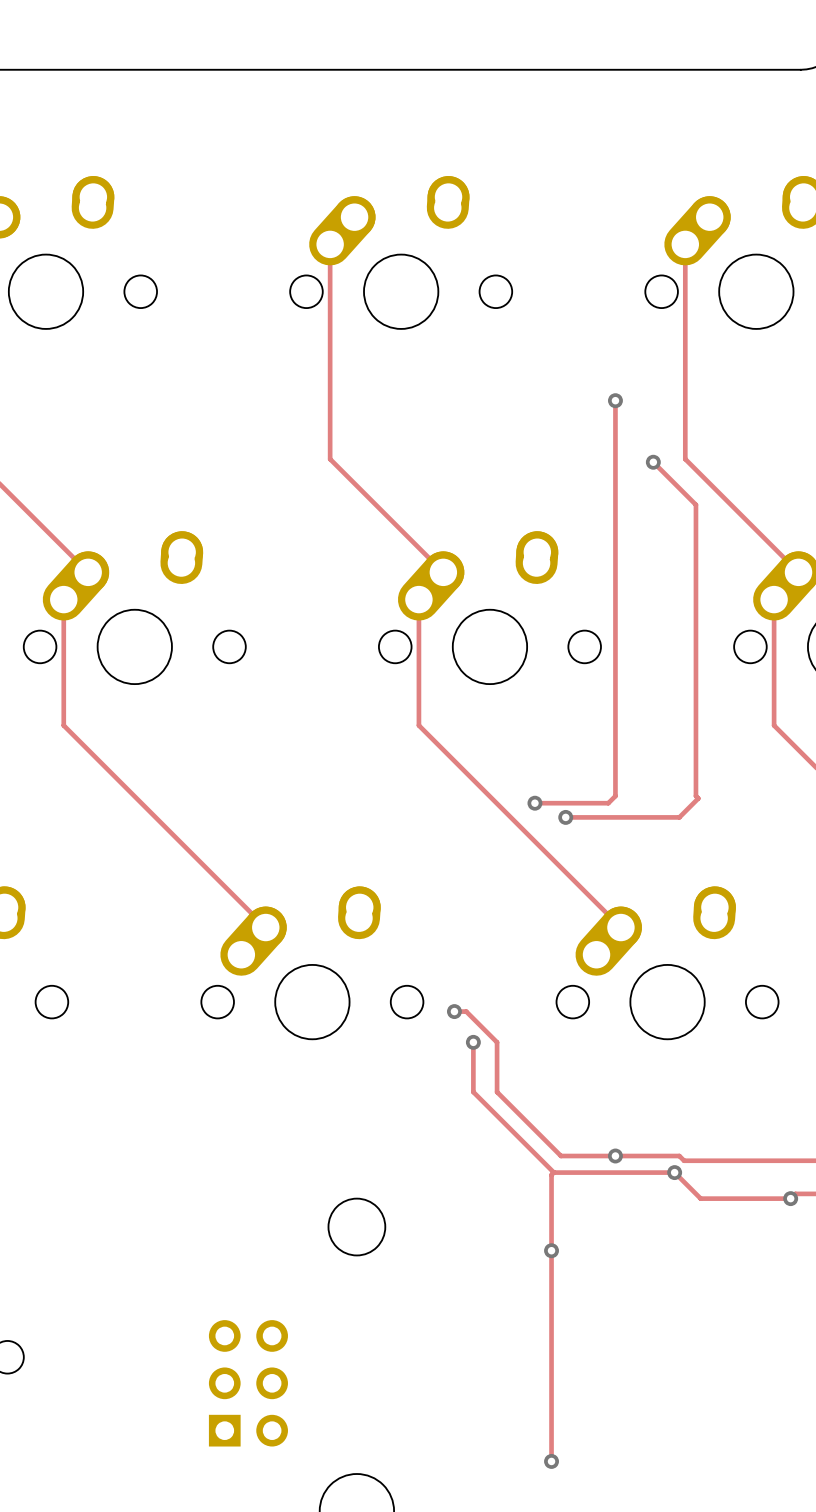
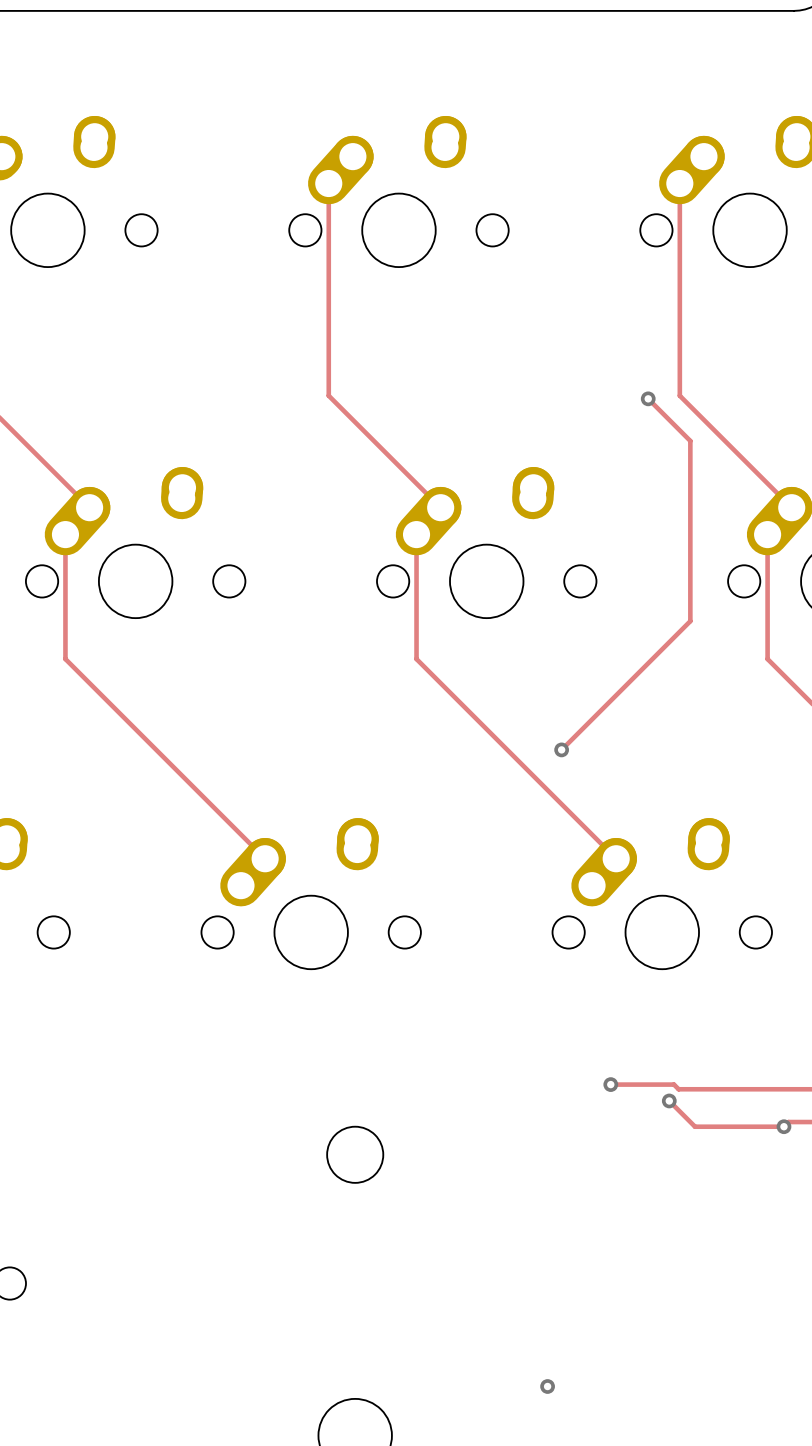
track: (615, 400) (615, 796) (608, 803) (534, 803) -> none
via: (615, 400) -> none
track: (695, 687) (695, 796) (698, 798) (679, 817) (565, 817) -> (690, 621) (561, 749)
via: (534, 803) -> none
track: (454, 1011) (466, 1011) (497, 1042) (497, 1092) (561, 1156) (615, 1156) -> none
via: (454, 1011) -> none
track: (473, 1042) (473, 1092) (553, 1172) -> none
via: (473, 1042) -> none
track: (553, 1172) (674, 1172) -> none
track: (553, 1172) (551, 1174) (551, 1461) -> none
via: (551, 1250) -> none
part: (248, 1383) -> none

